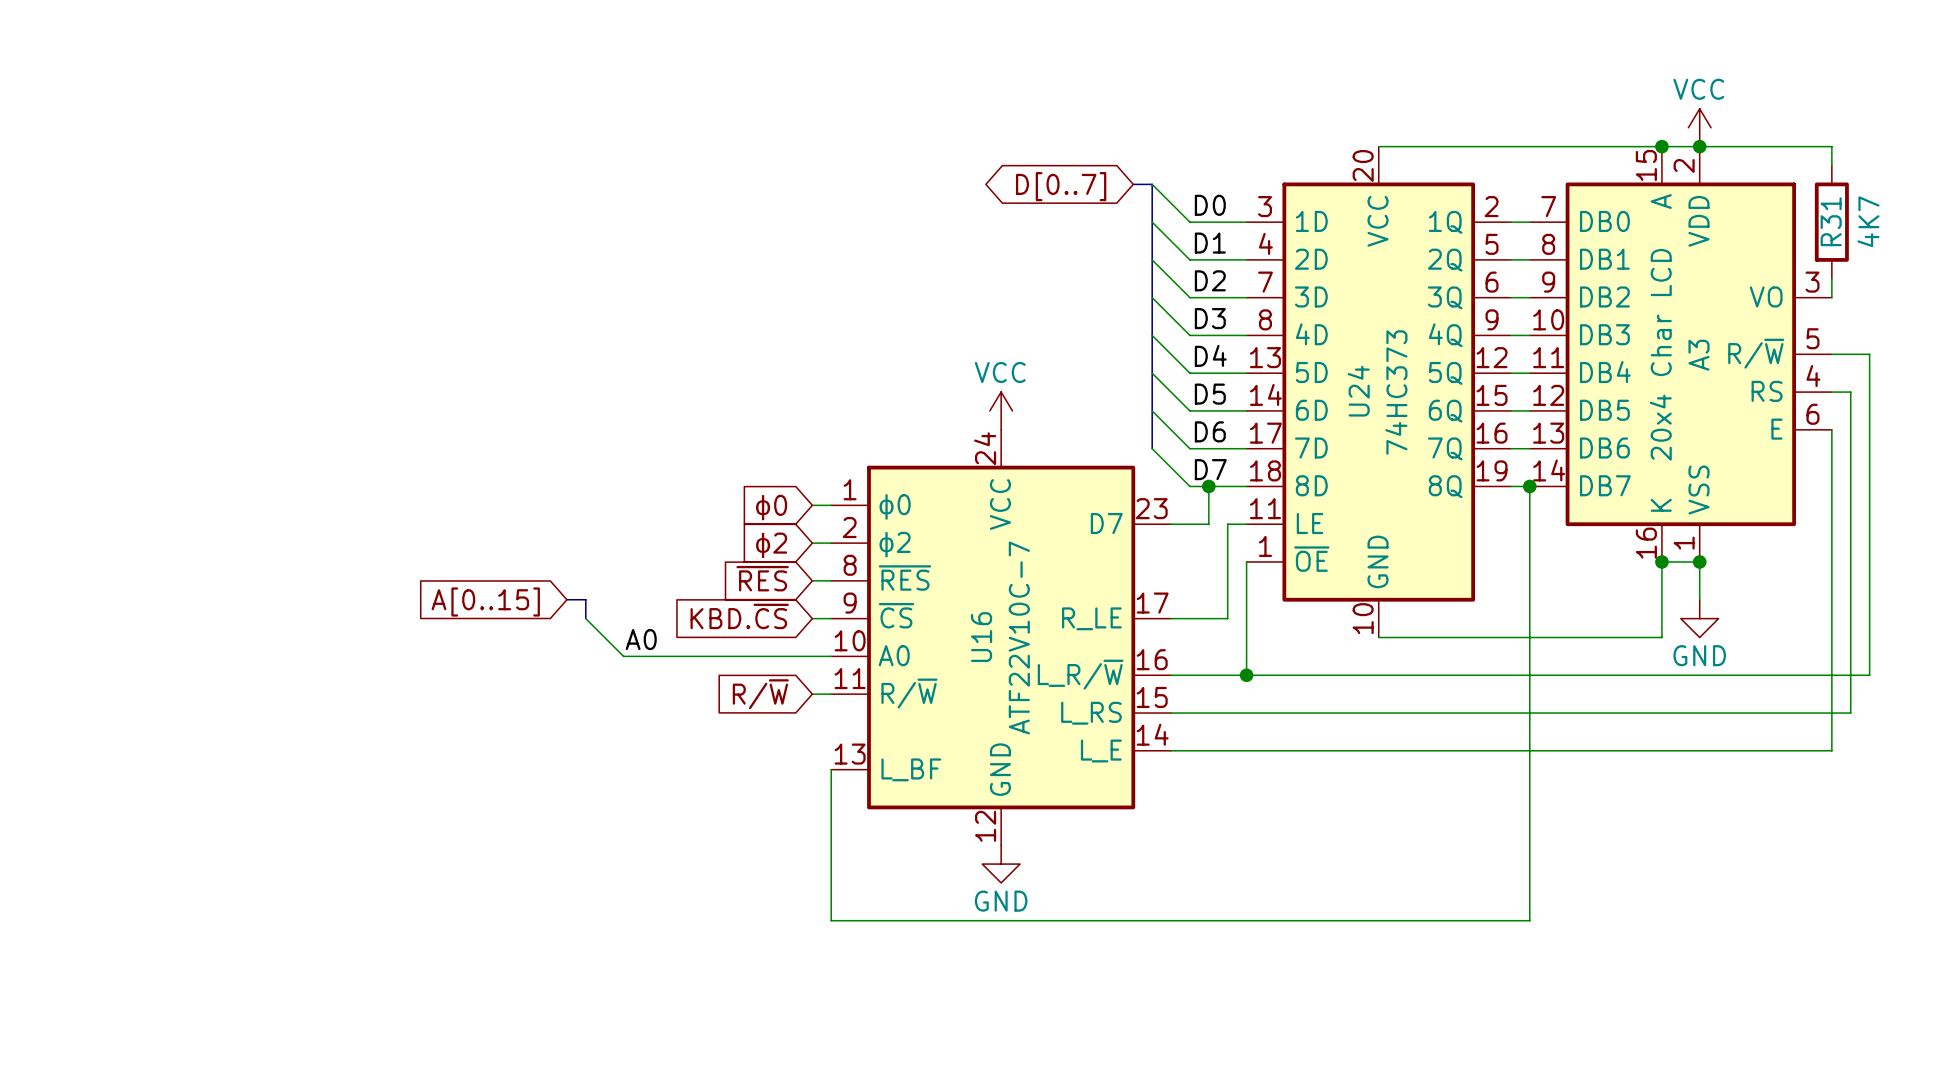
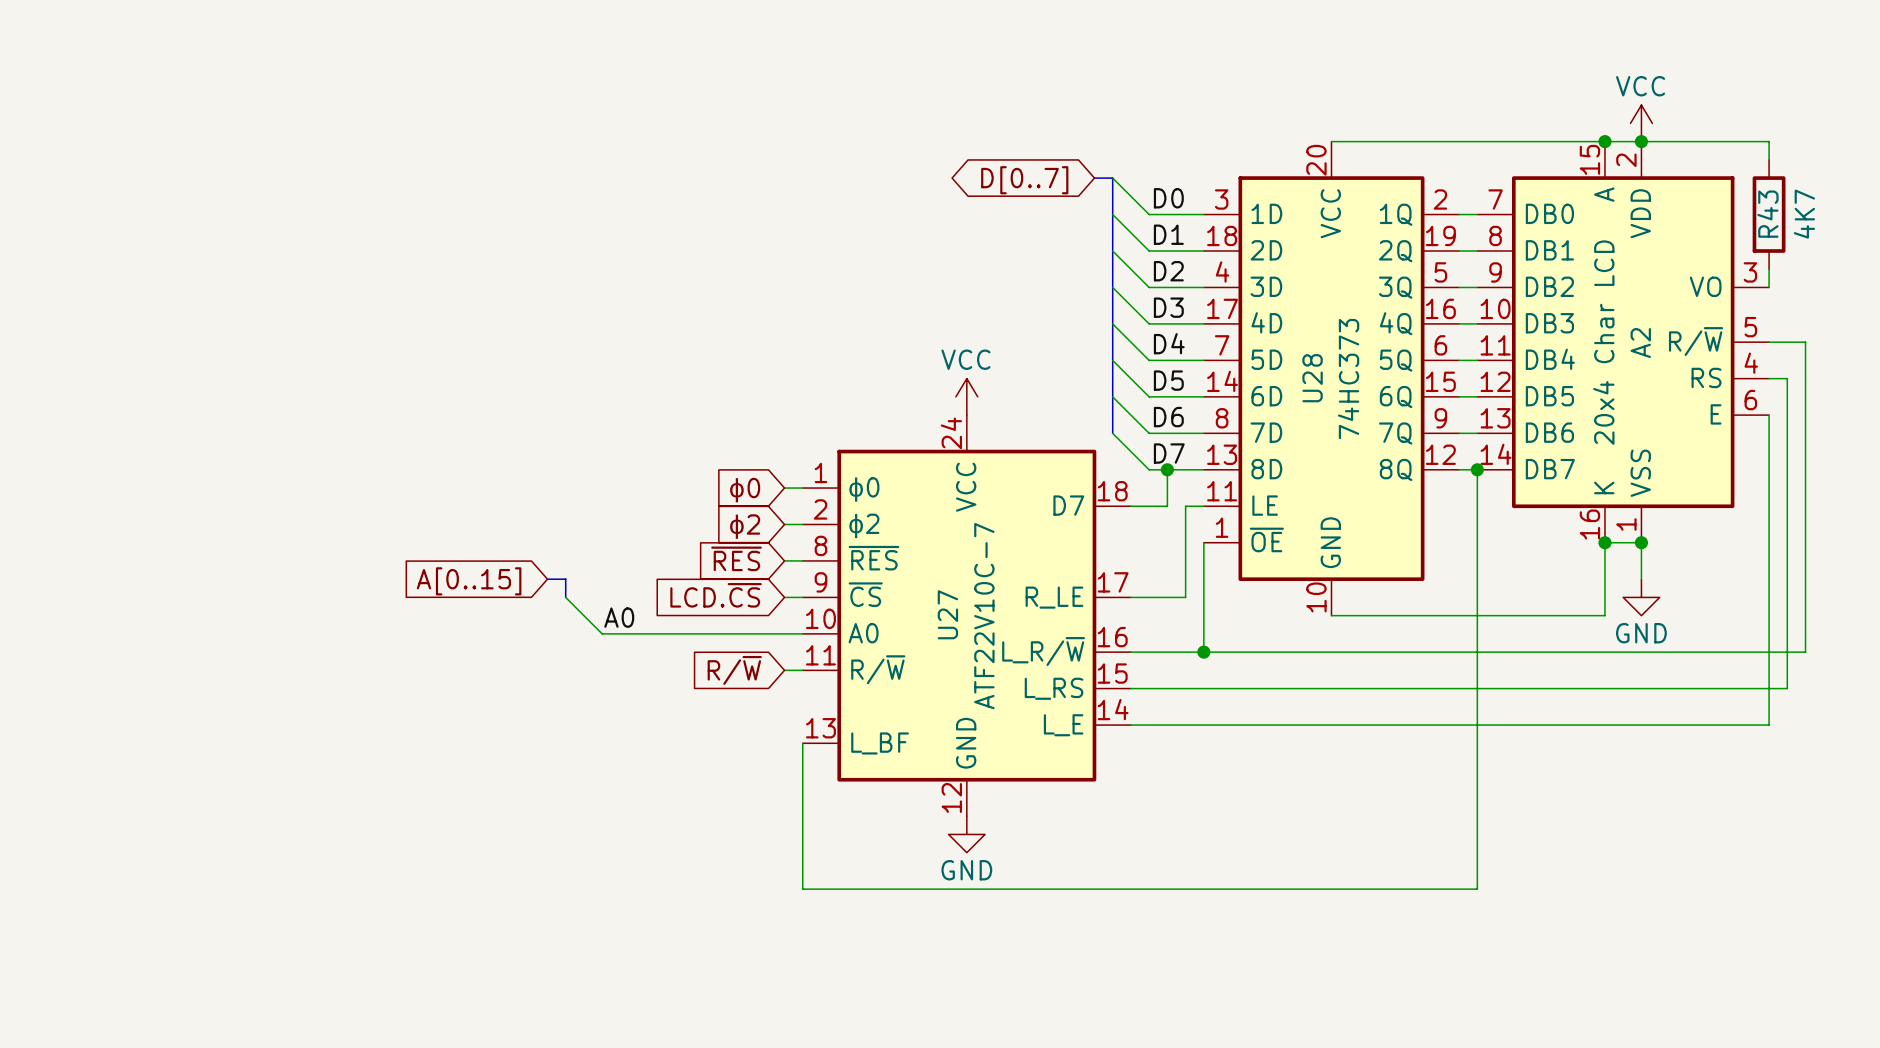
U24 symbol: [1246, 146, 1511, 638] -> [1203, 141, 1460, 616]
R31 name: R31 (1831, 221) -> R43 (1767, 214)
A3 name: A3 (1698, 355) -> A2 (1640, 343)
U24 name: U24 (1358, 391) -> U28 (1312, 378)
U16 pin number: 23 (1151, 508) -> 18 (1112, 491)
global label: KBD.~{CS} (739, 616) -> LCD.~{CS} (716, 595)
U16 name: U16 (981, 637) -> U27 (947, 614)

